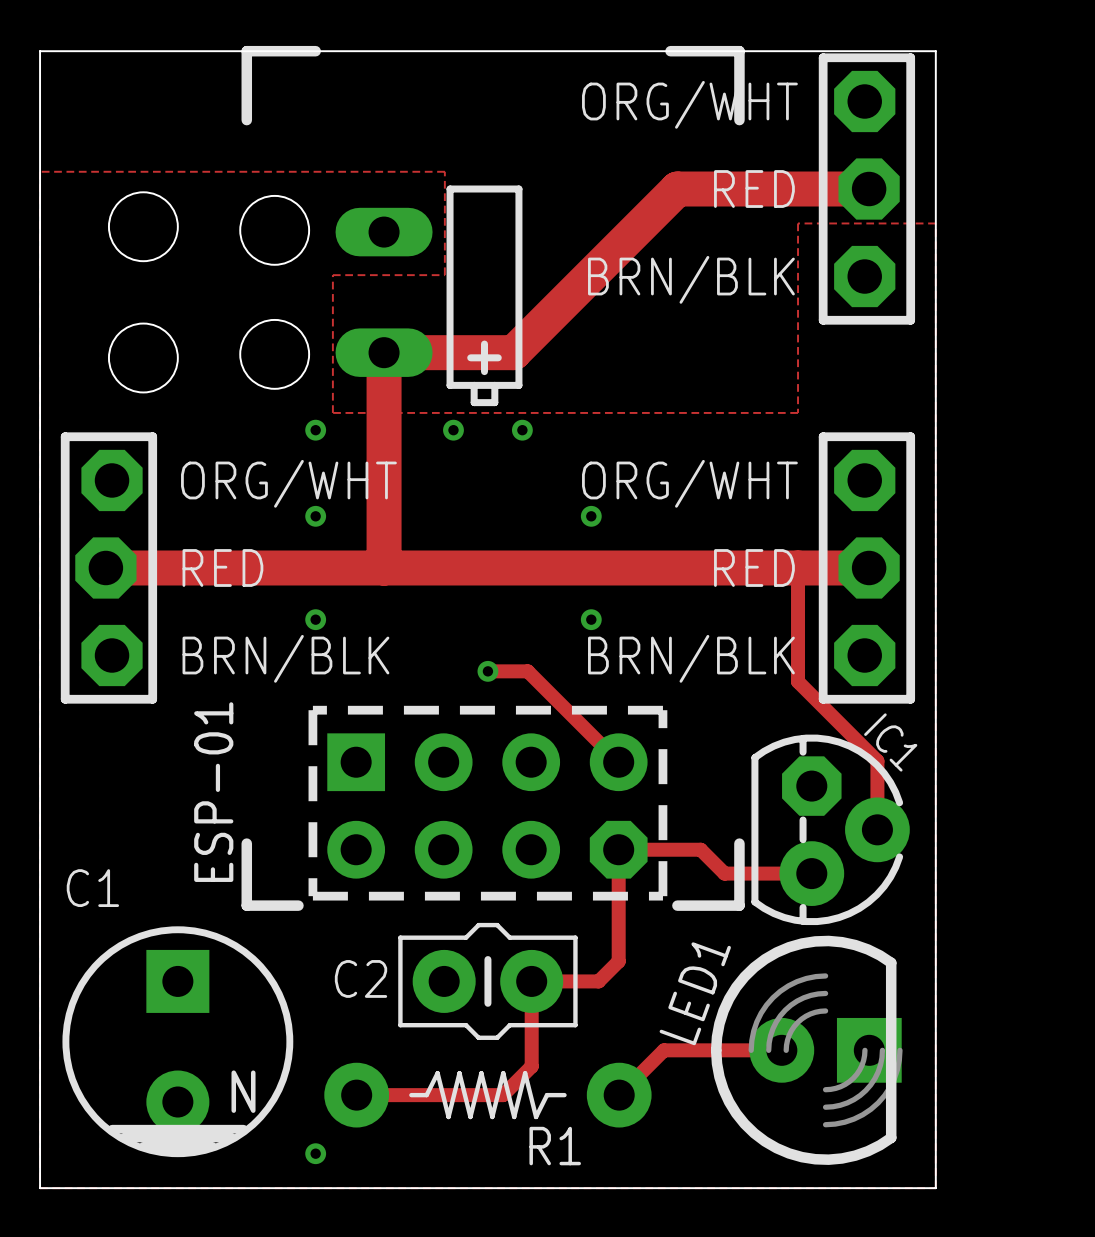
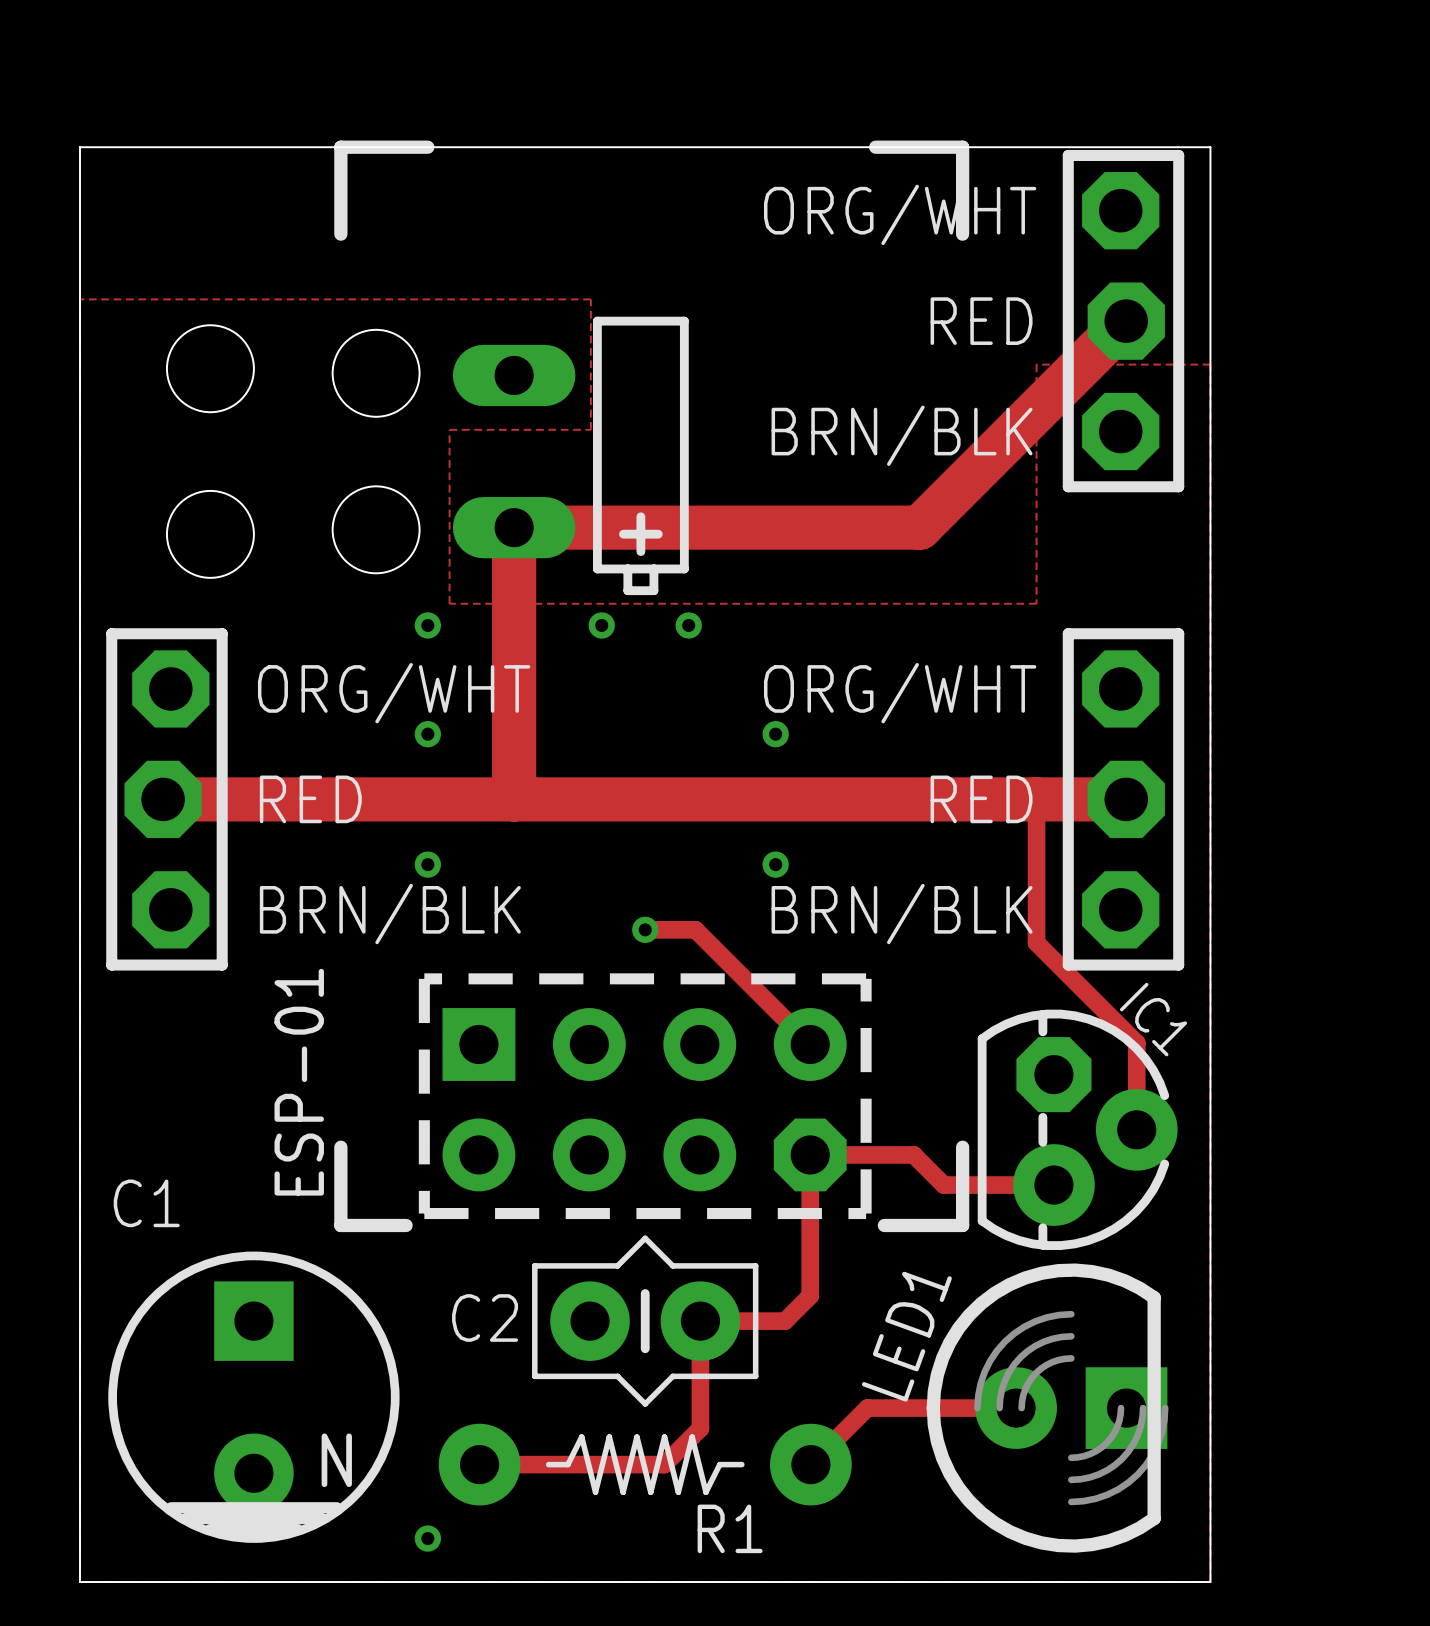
track: (869, 189) (677, 189) (513, 352) -> (1126, 321) (919, 527) (677, 527)
C2 footprint: [398, 922, 578, 1040] -> [532, 1235, 759, 1407]

